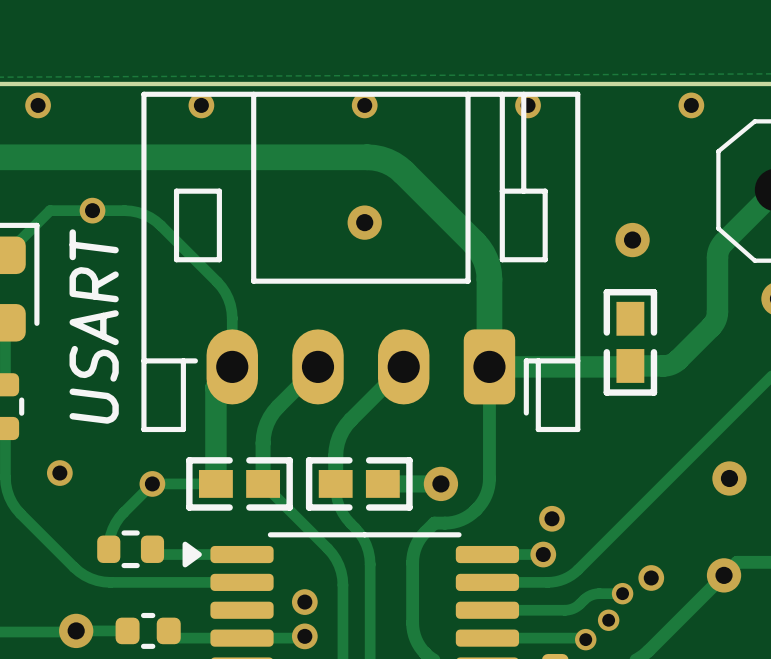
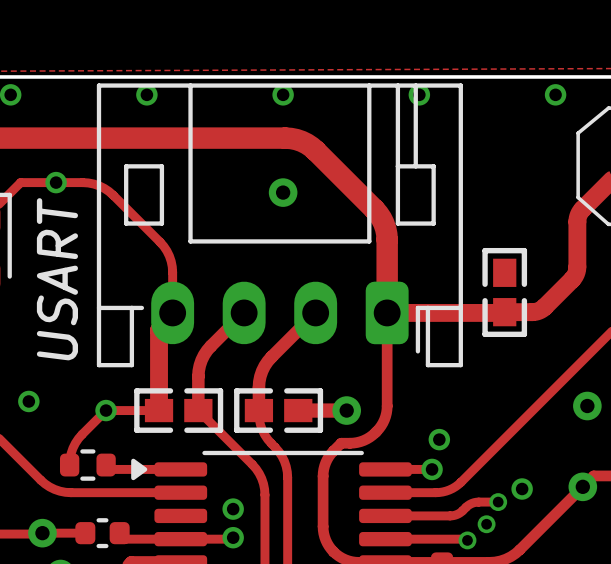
via: (632, 240) -> none

